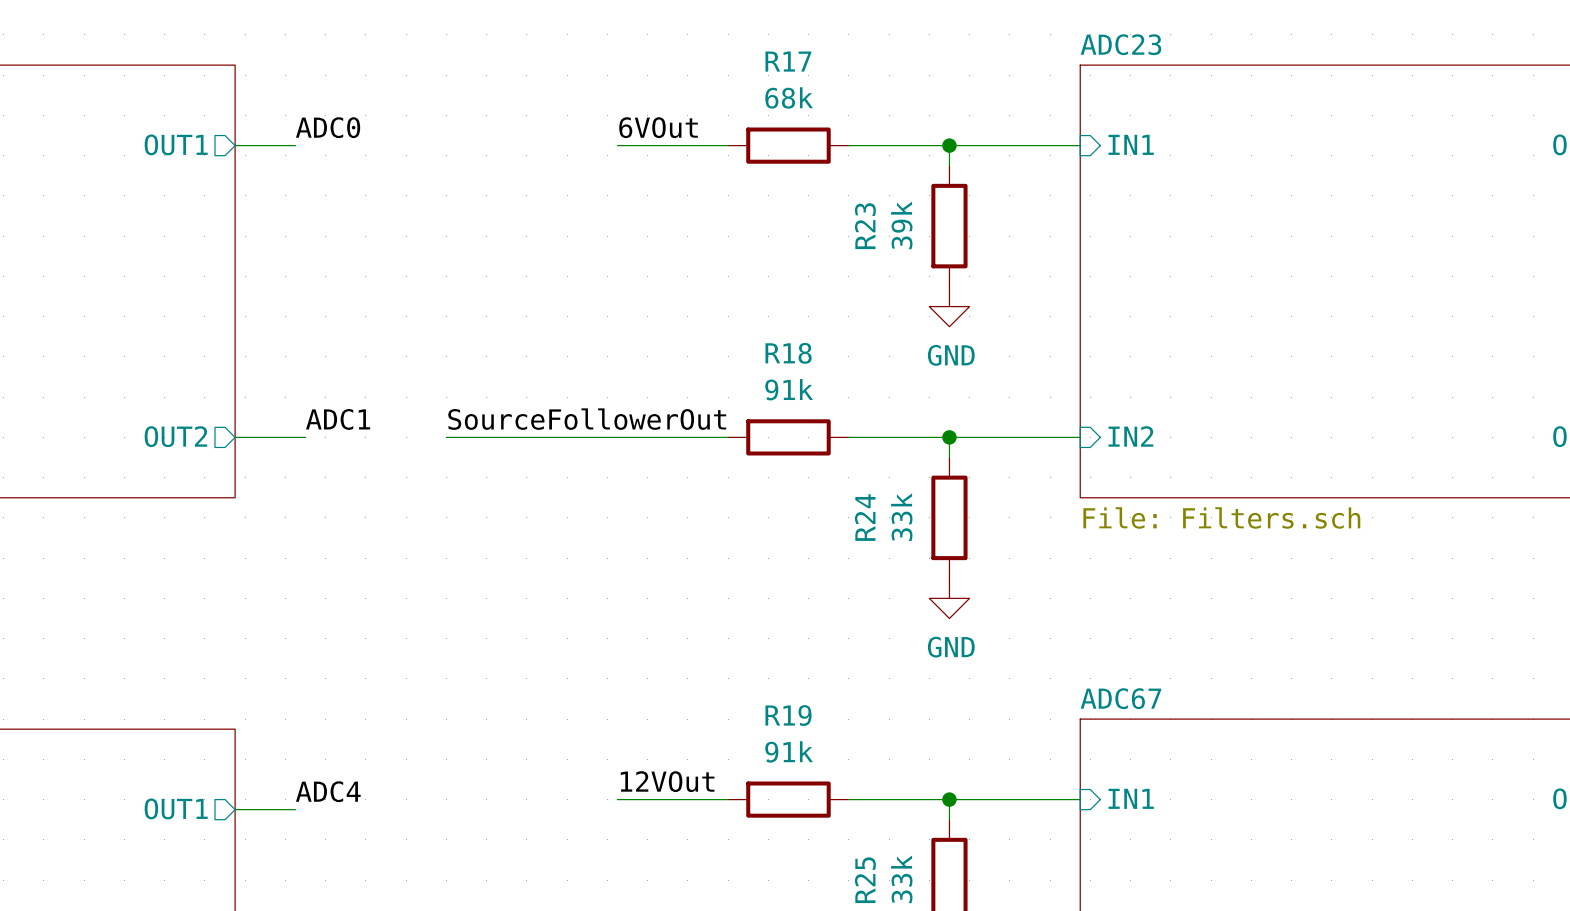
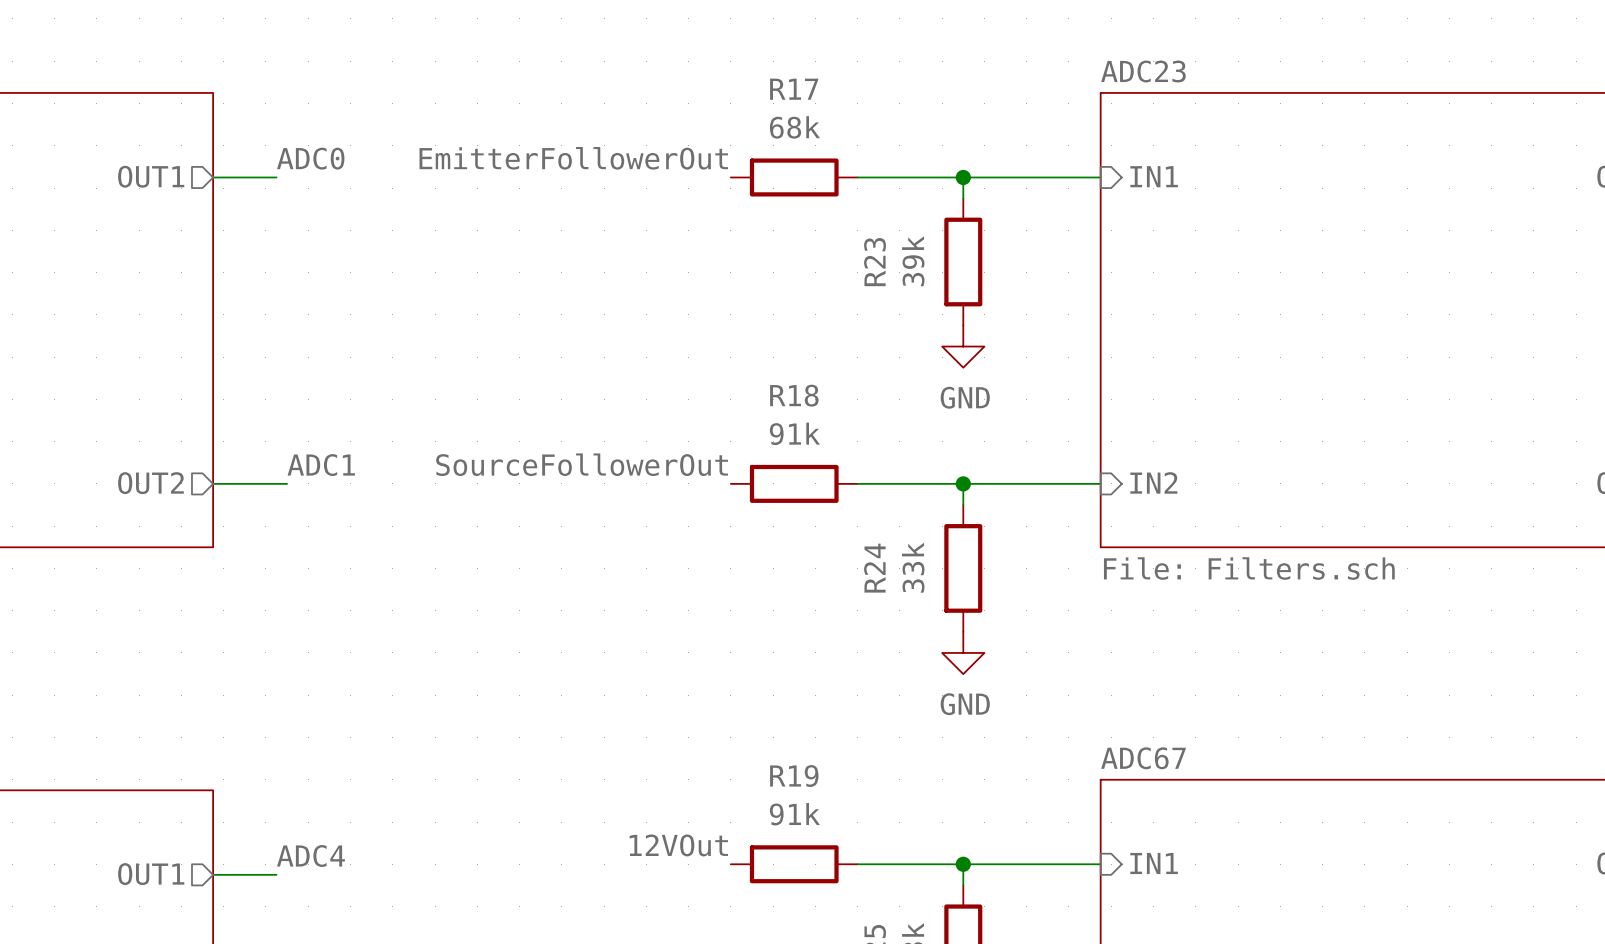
label: none -> EmitterFollowerOut (573, 158)
label: 6VOut (658, 127) -> none
wire: (617, 145) (728, 145) -> none
label position: SourceFollowerOut (587, 419) -> SourceFollowerOut (582, 464)
wire: (446, 437) (728, 437) -> none
label position: 12VOut (667, 781) -> 12VOut (678, 845)
wire: (617, 799) (728, 799) -> none

